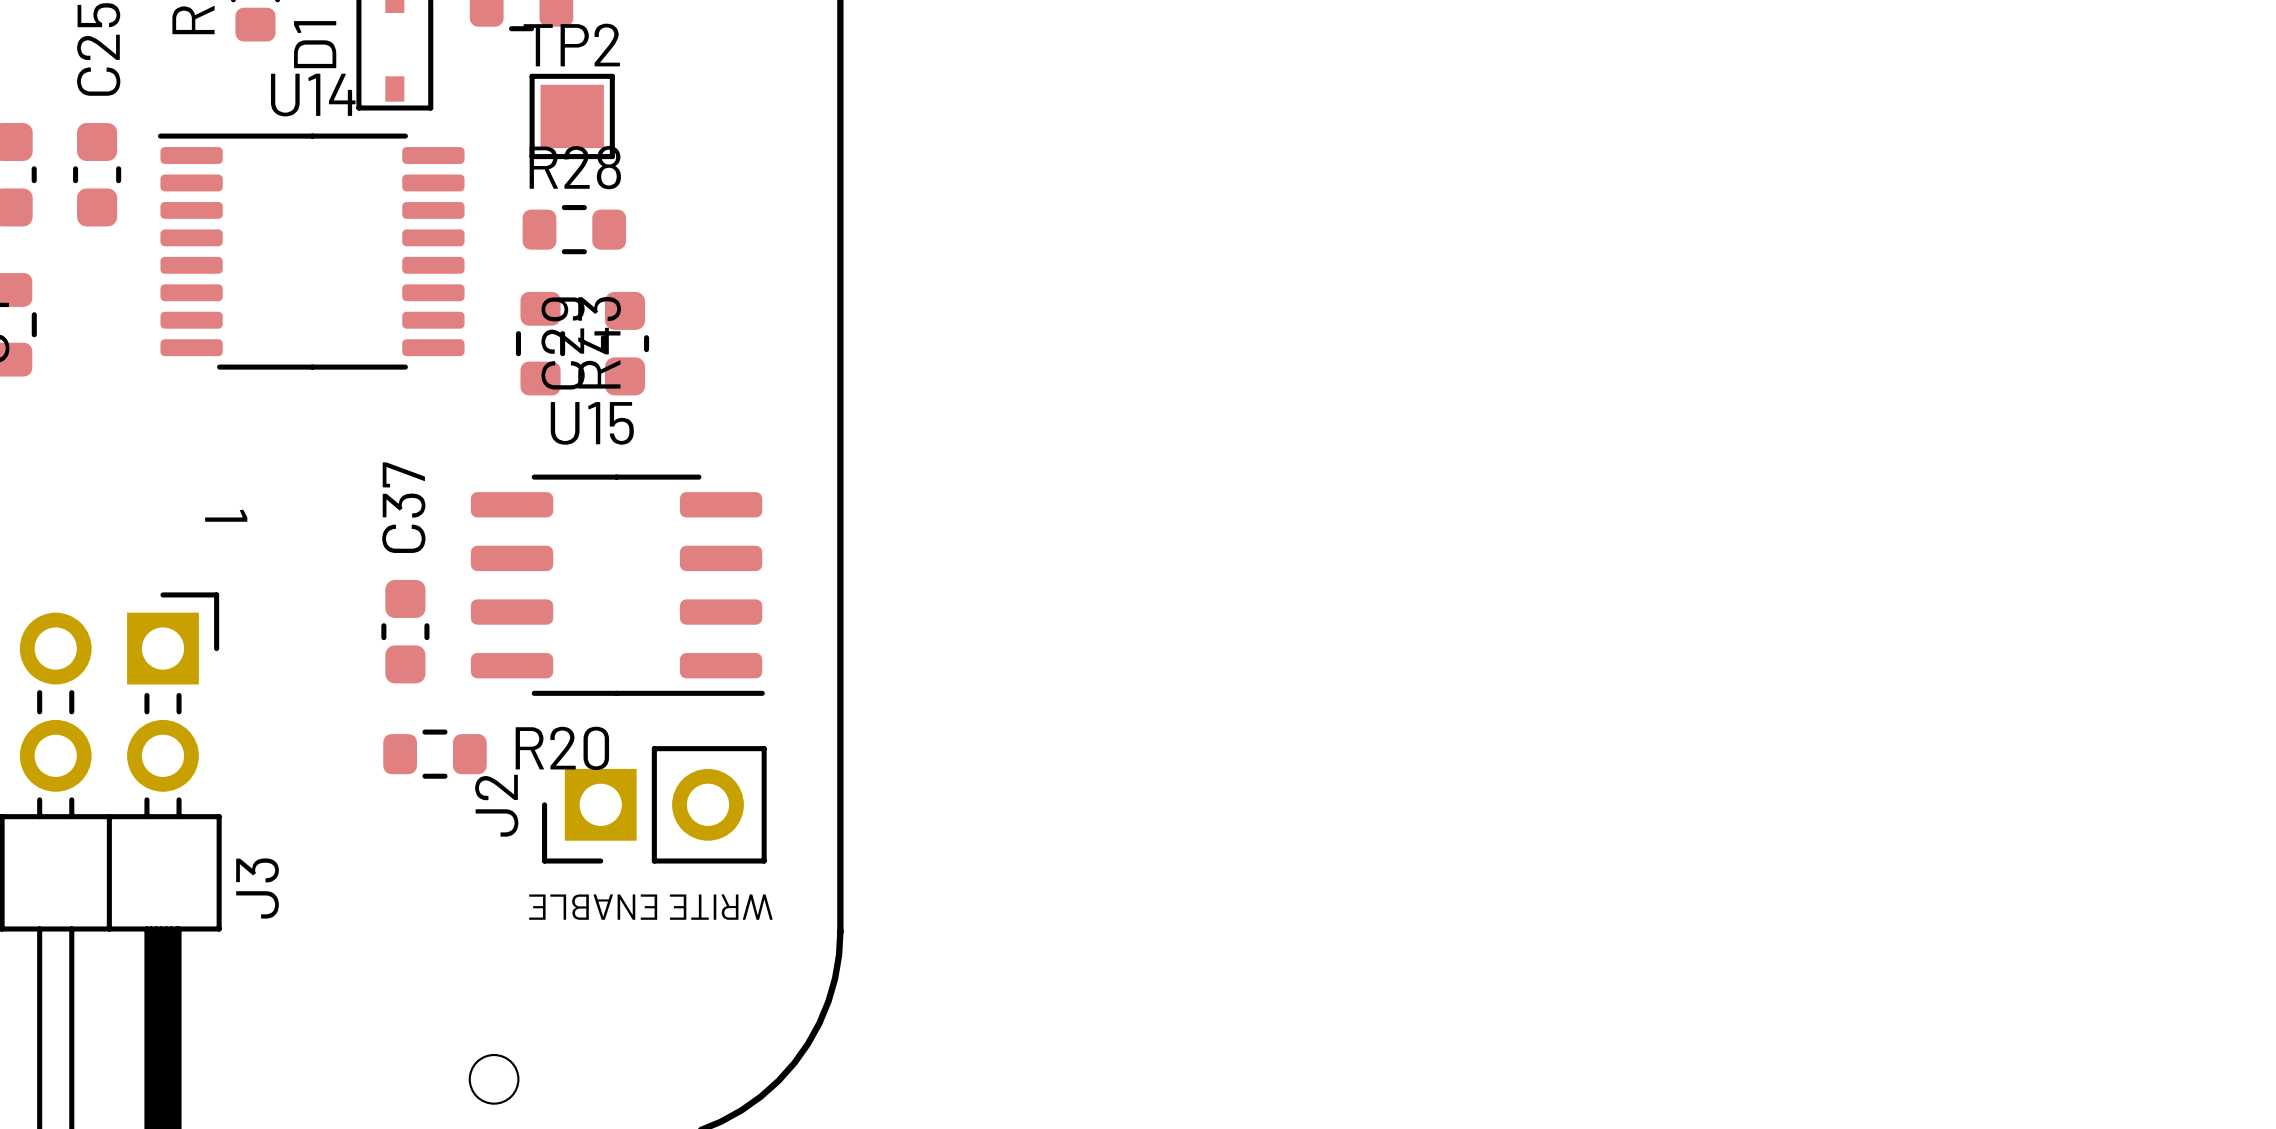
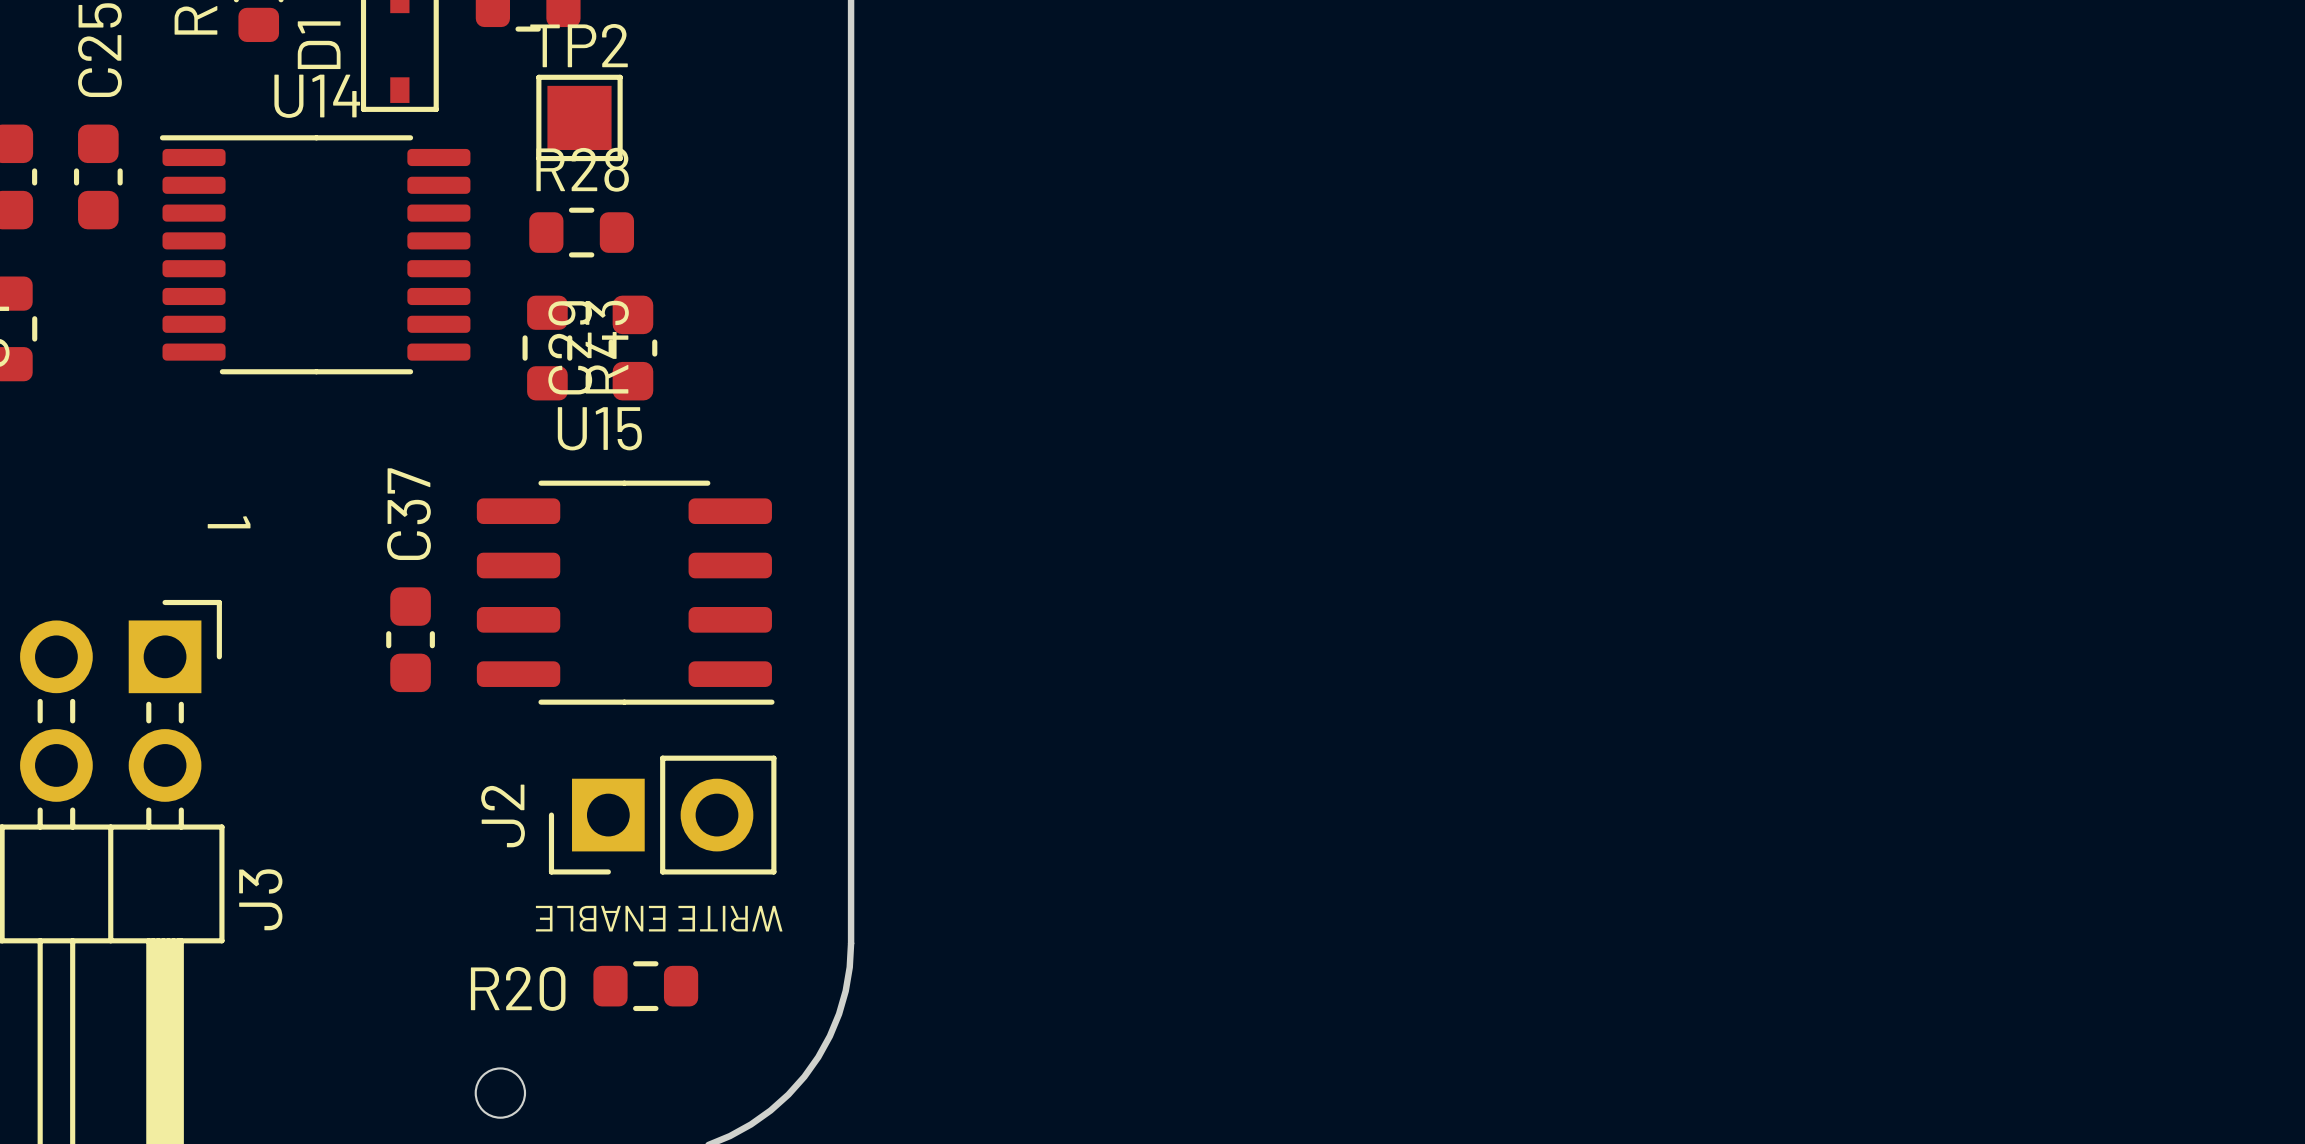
R20 name position: R20 (562, 748) -> R20 (518, 988)
R20 position: (434, 754) -> (645, 986)

